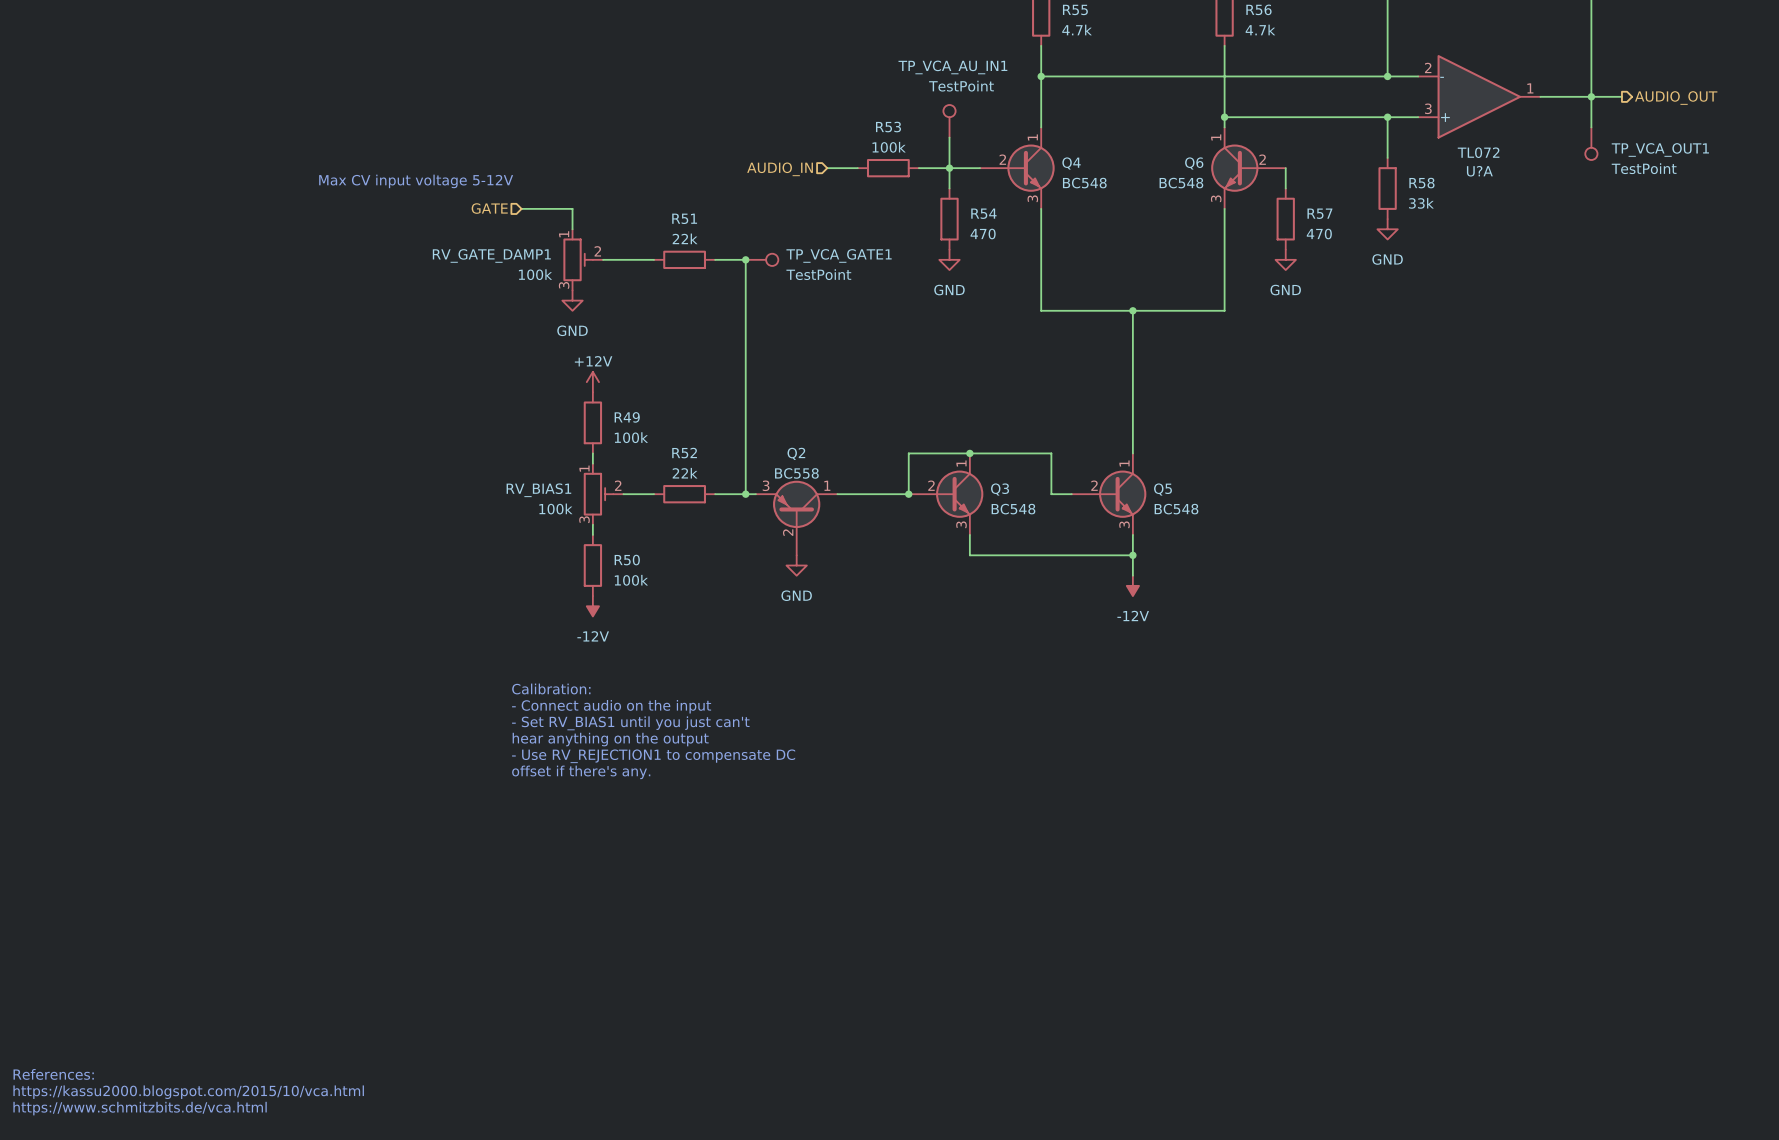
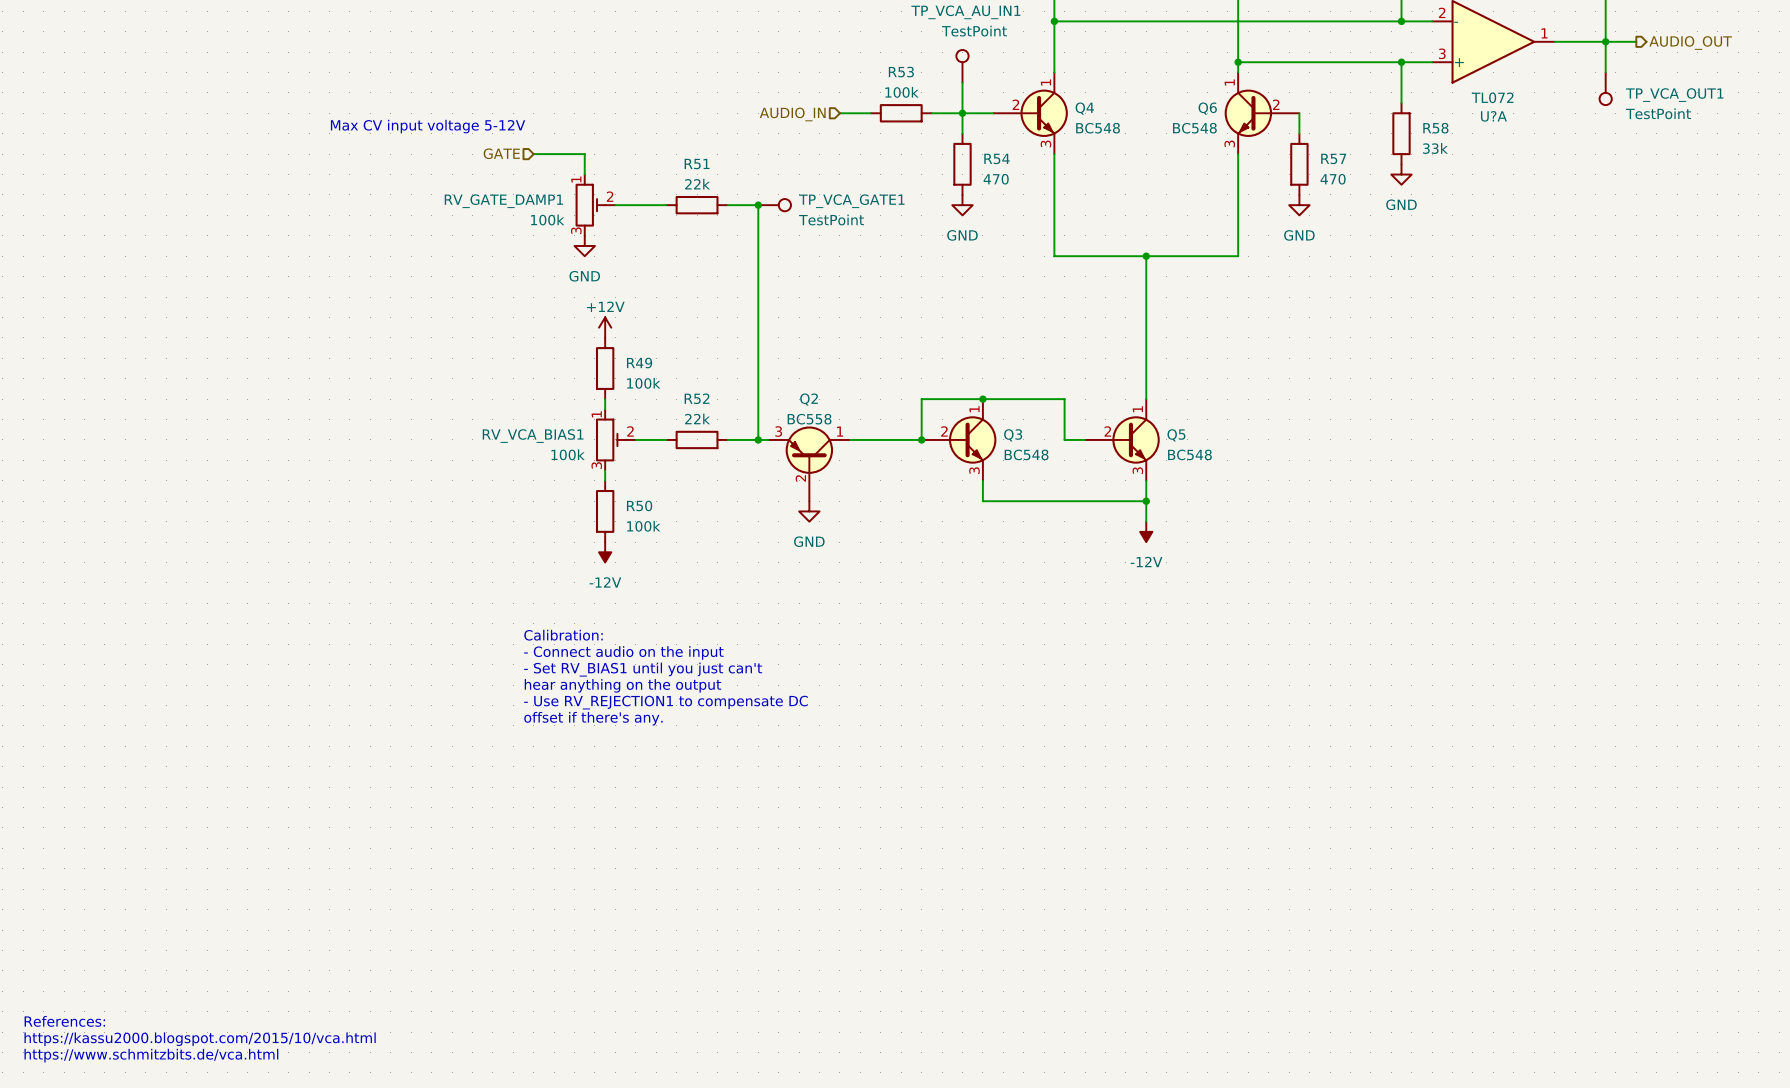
RV_BIAS1 name: RV_BIAS1 (538, 490) -> RV_VCA_BIAS1 (533, 436)

